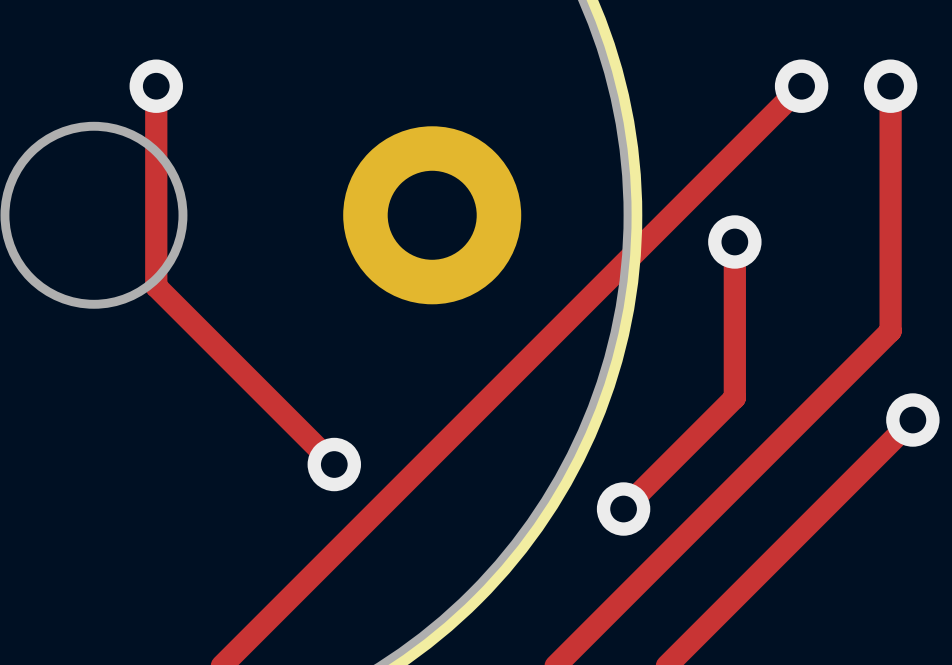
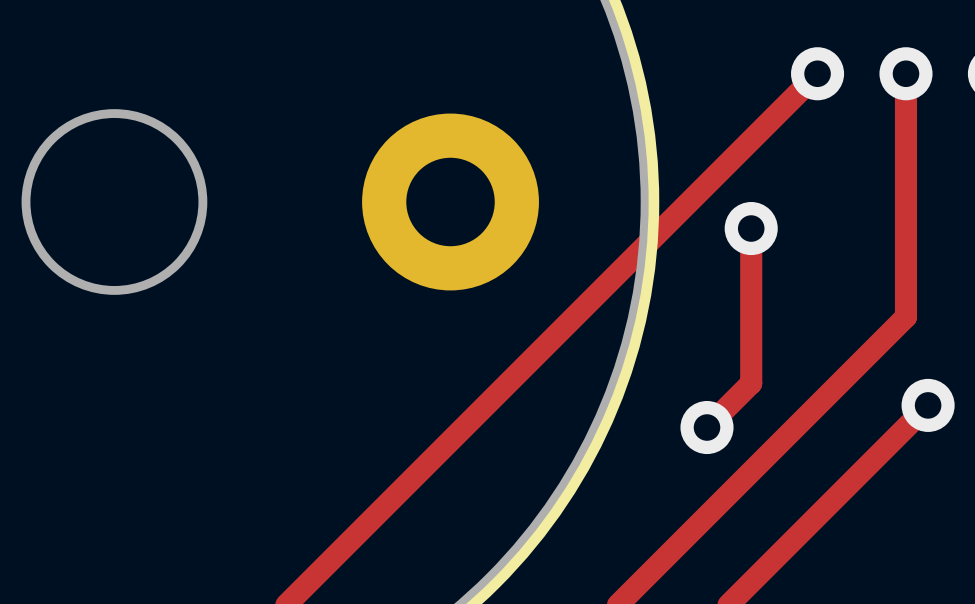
track: (156, 86) (156, 286) (334, 464) -> none
via: (156, 86) -> none
track: (690, 442) (623, 509) -> none
via: (334, 464) -> none
via position: (623, 509) -> (707, 427)

